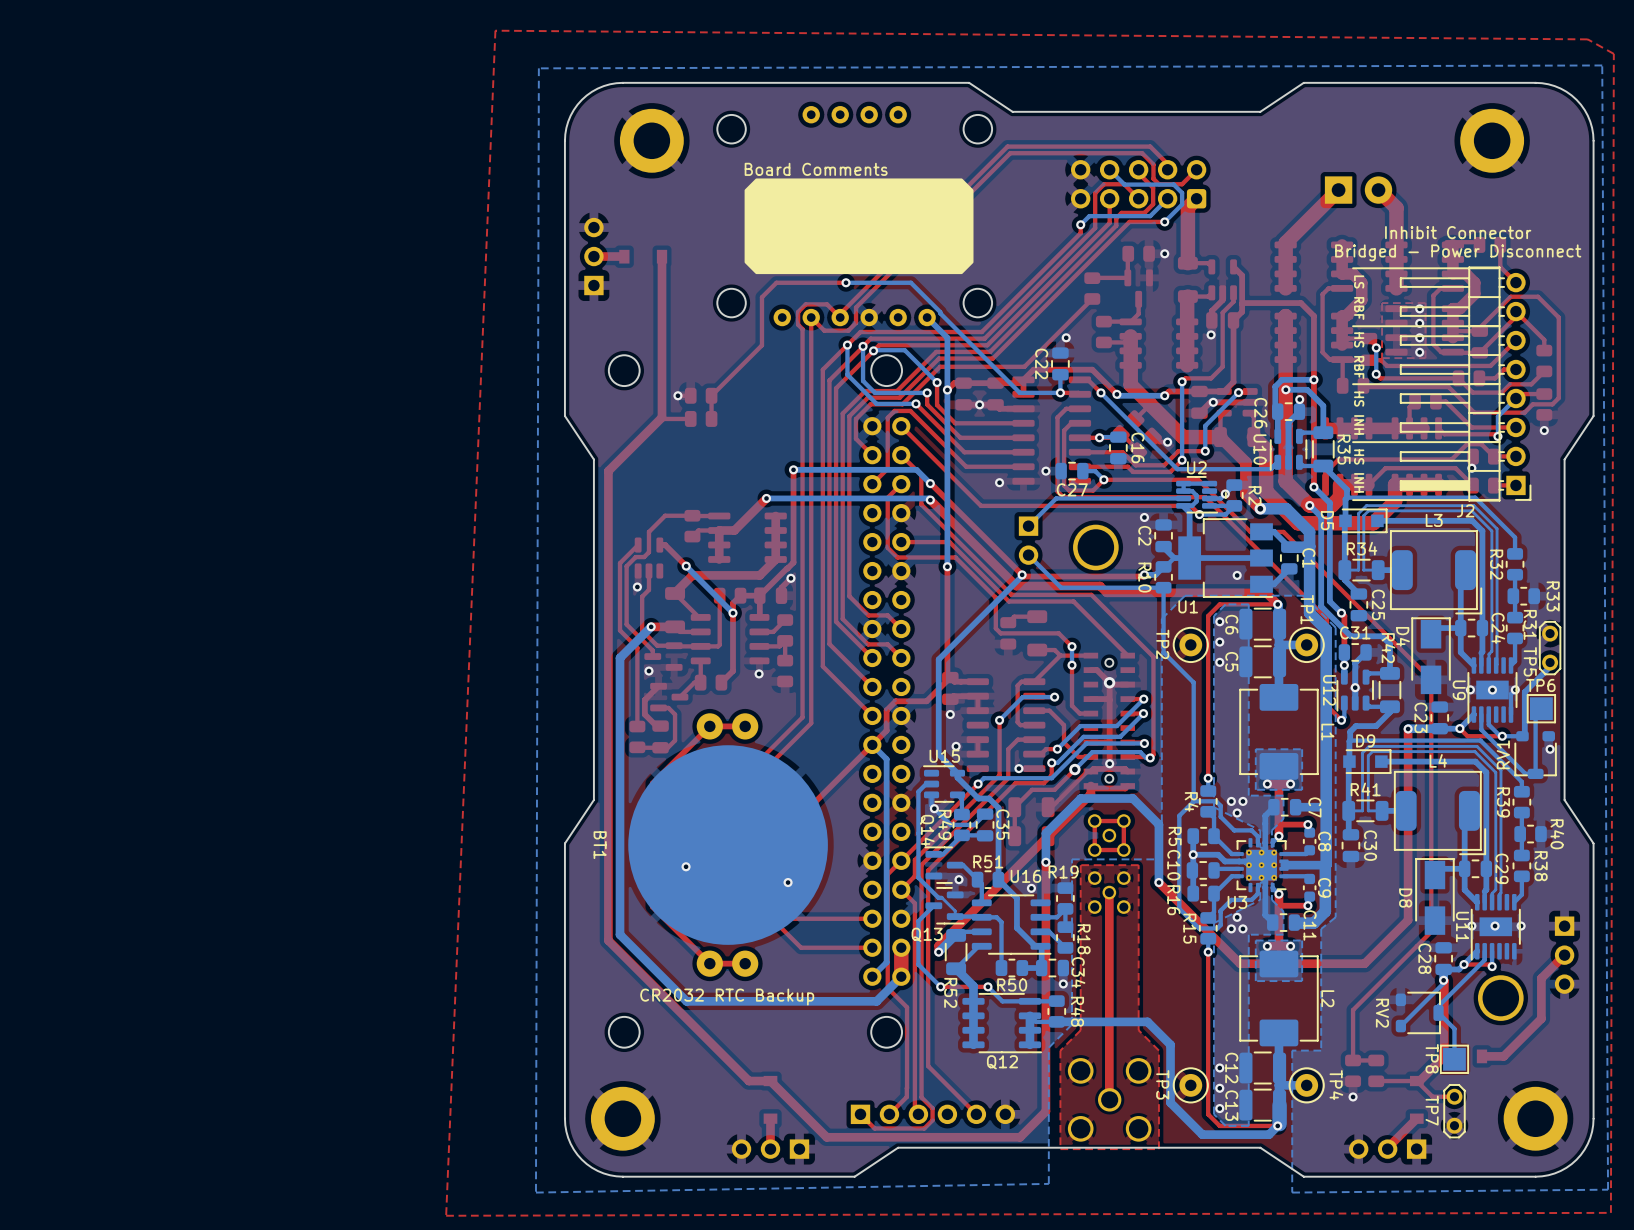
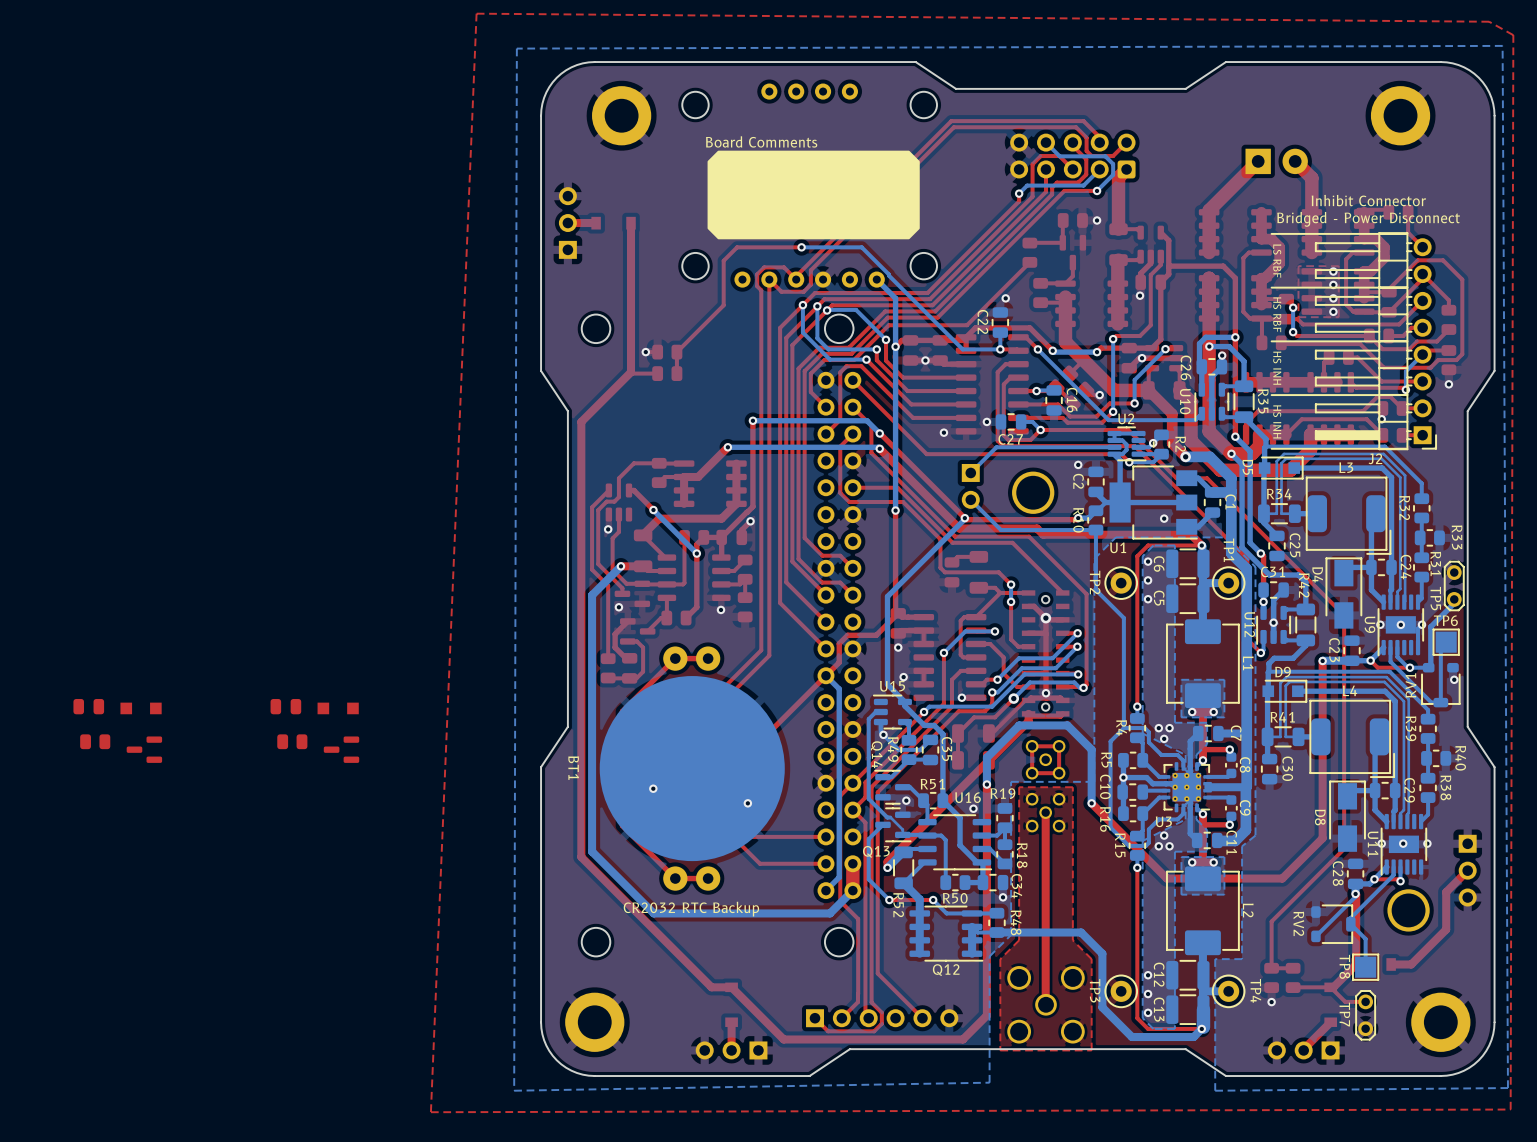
part: none -> (88, 706)
part: none -> (285, 706)
part: none -> (141, 708)
part: none -> (338, 708)
part: none -> (95, 741)
part: none -> (292, 741)
part: none -> (144, 749)
part: none -> (341, 749)

